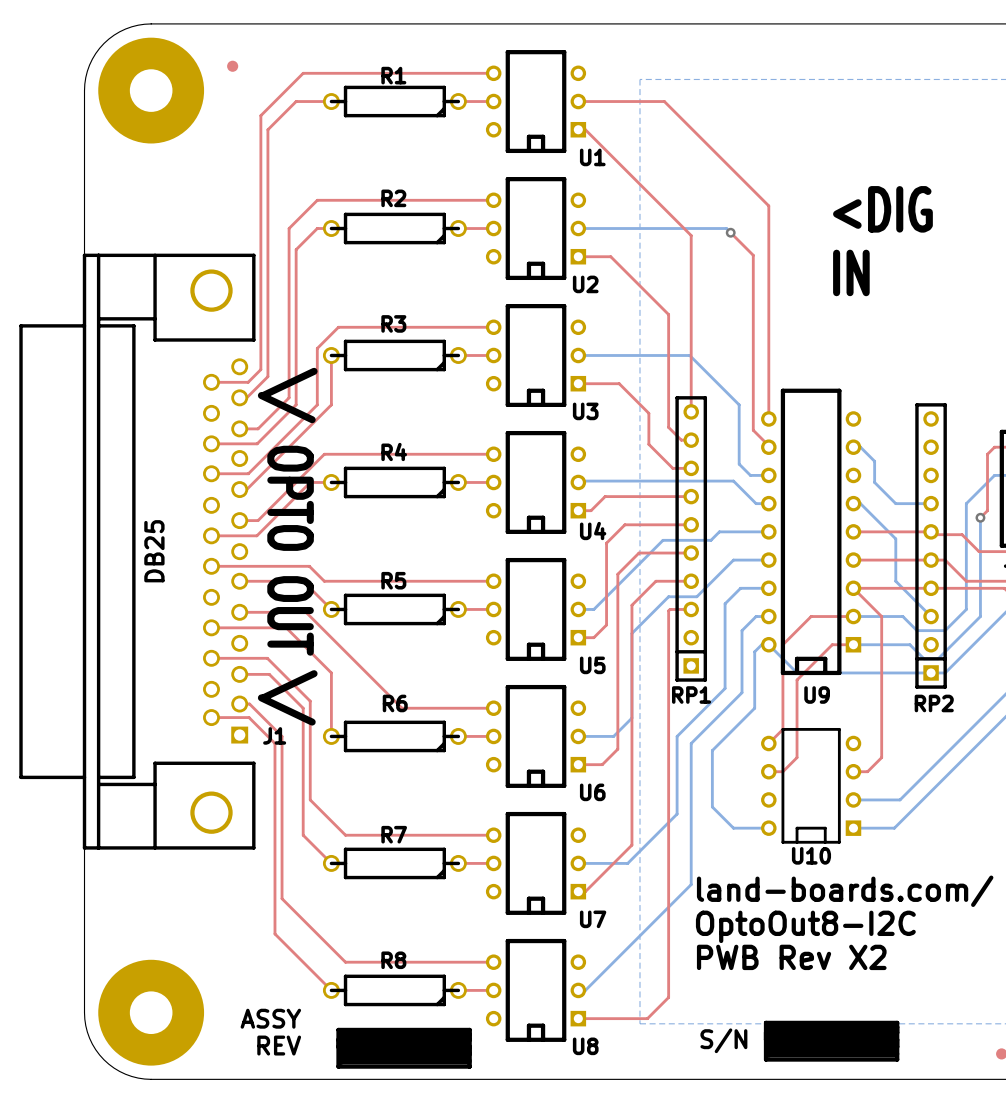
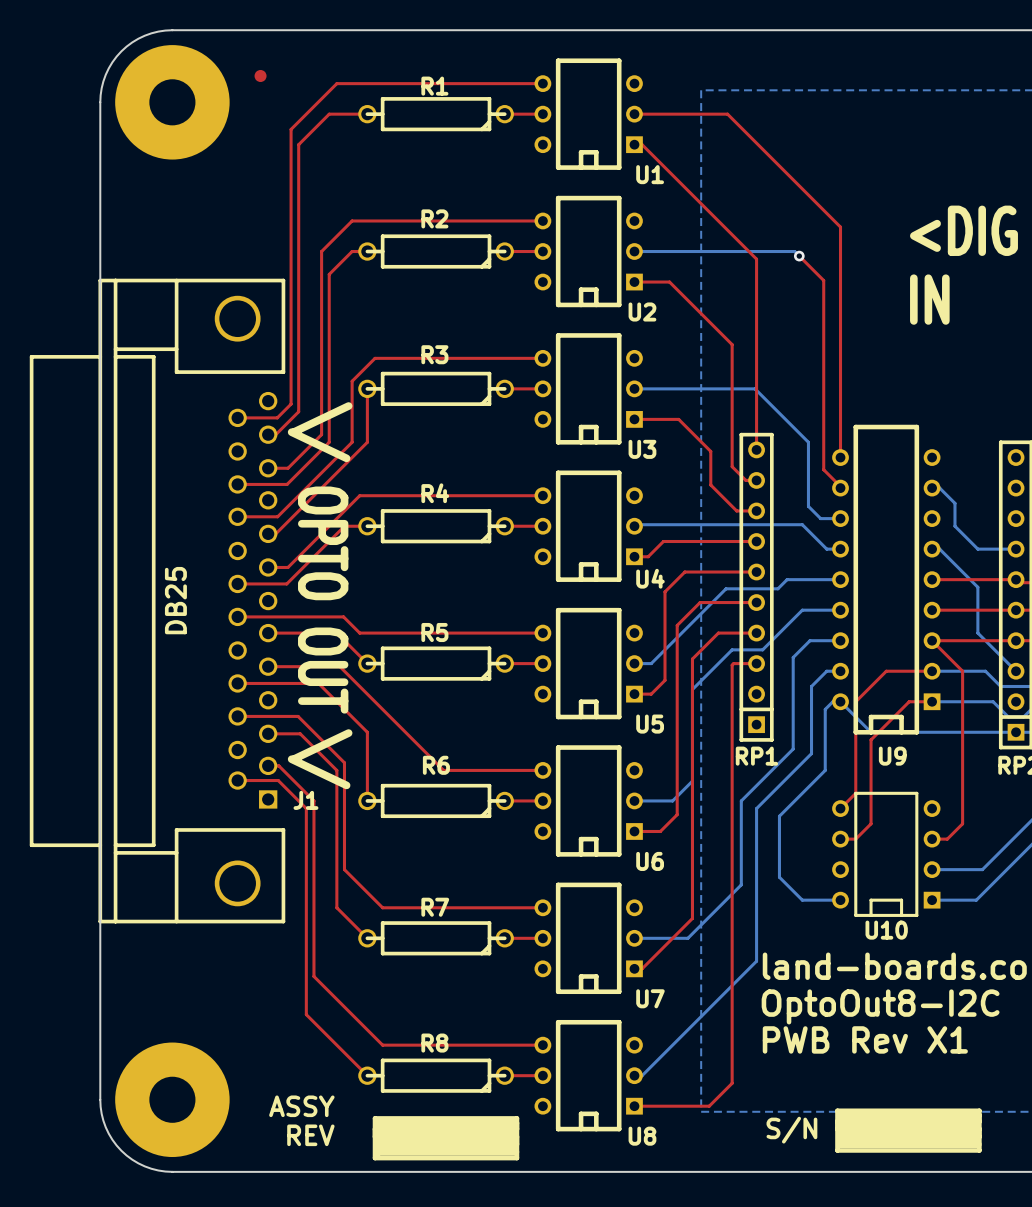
text: PWB Rev X2 (791, 957) -> PWB Rev X1 (865, 1039)

